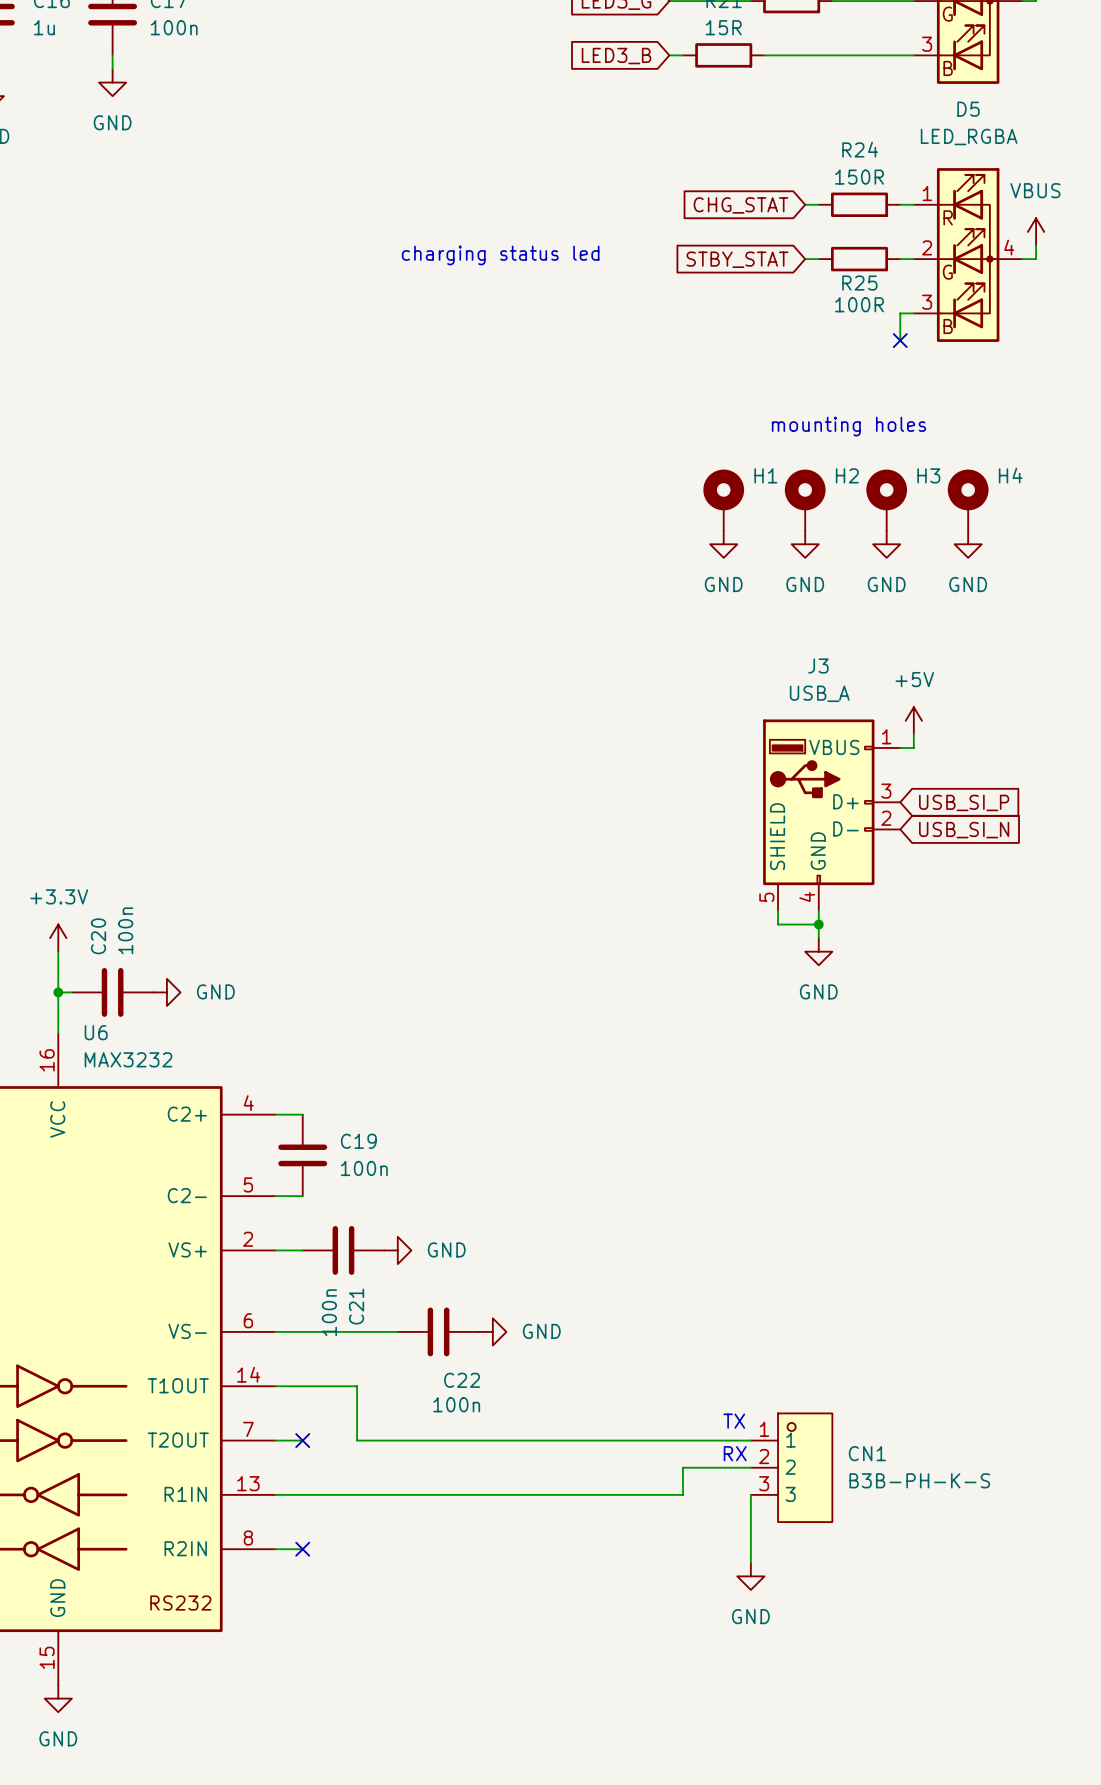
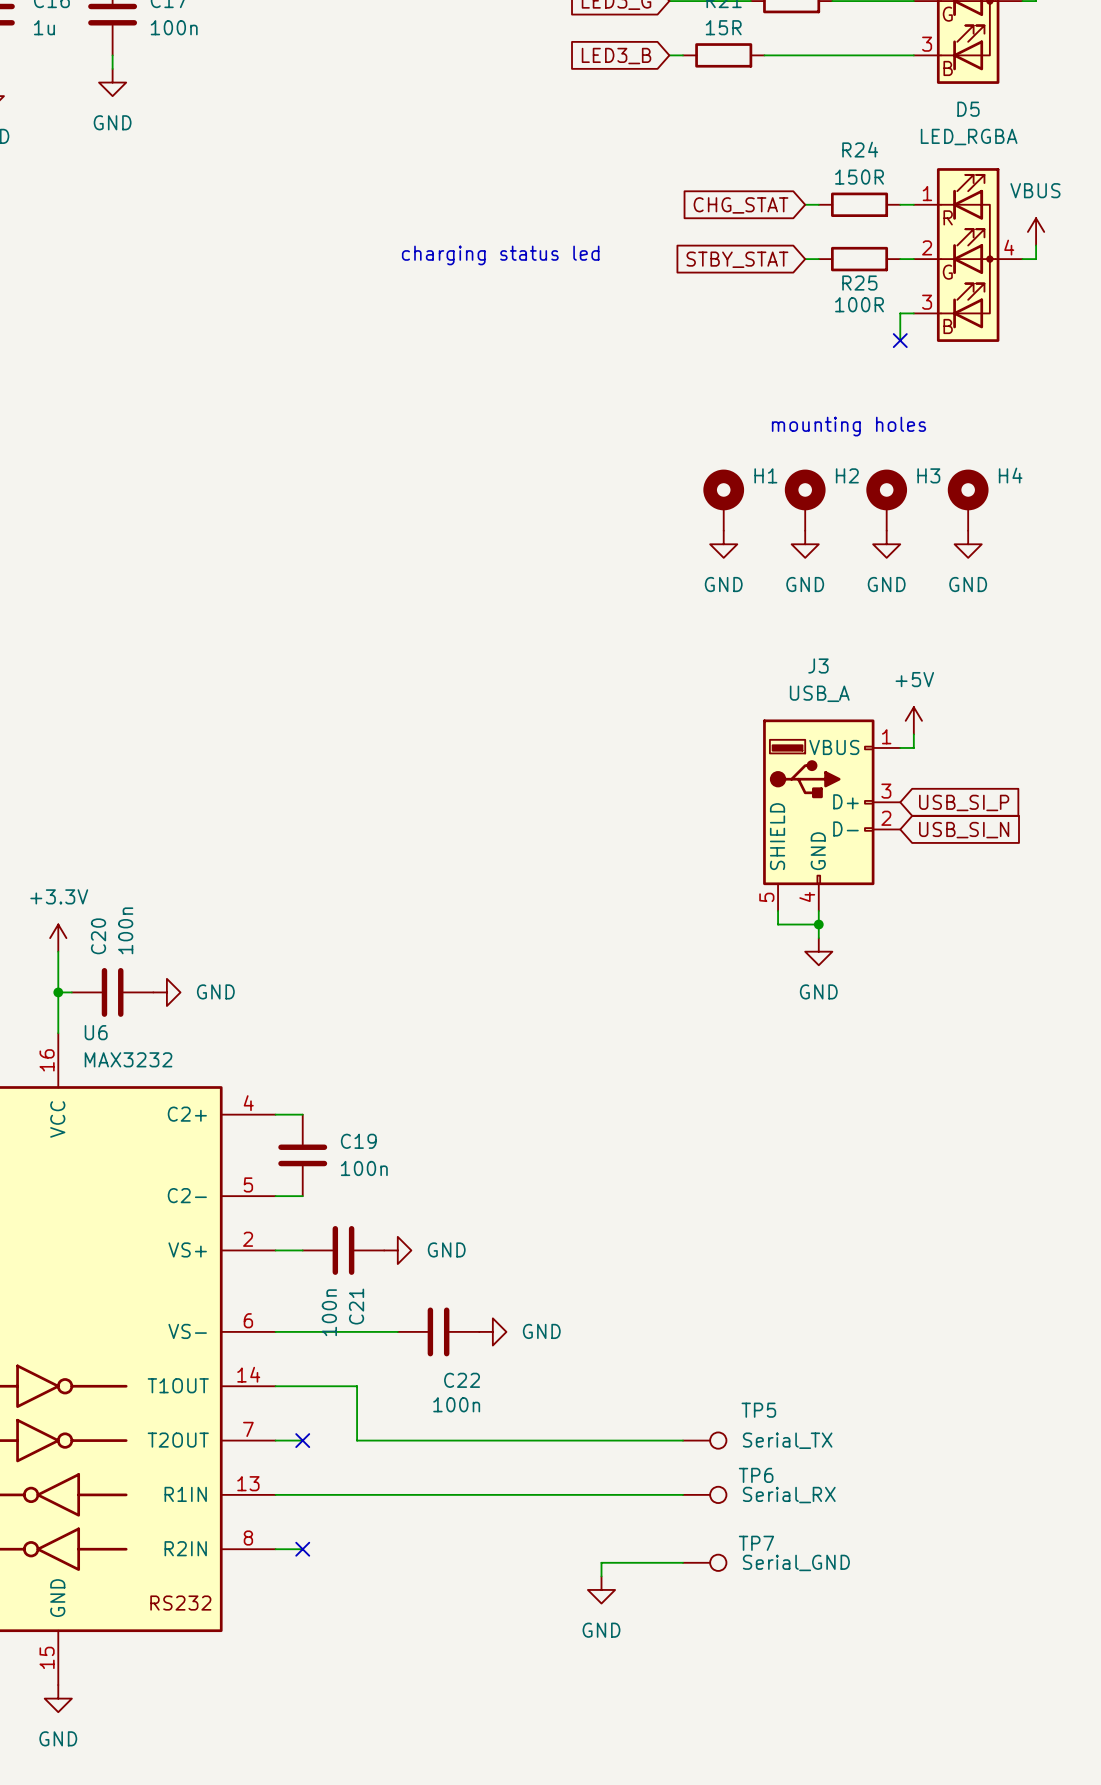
text: TX (734, 1421) -> none
wire: (682, 1440) (750, 1440) -> none
TP5: none -> Serial_TX (704, 1440)
text: RX (735, 1453) -> none
wire: (750, 1467) (682, 1467) (682, 1494) -> none
CN1: B3B-PH-K-S (791, 1467) -> none
TP6: none -> Serial_RX (704, 1494)
wire: (750, 1494) (750, 1562) -> none
wire: none -> (682, 1562) (601, 1562) (601, 1576)
TP7: none -> Serial_GND (704, 1562)
power symbol position: GND (750, 1576) -> GND (601, 1589)

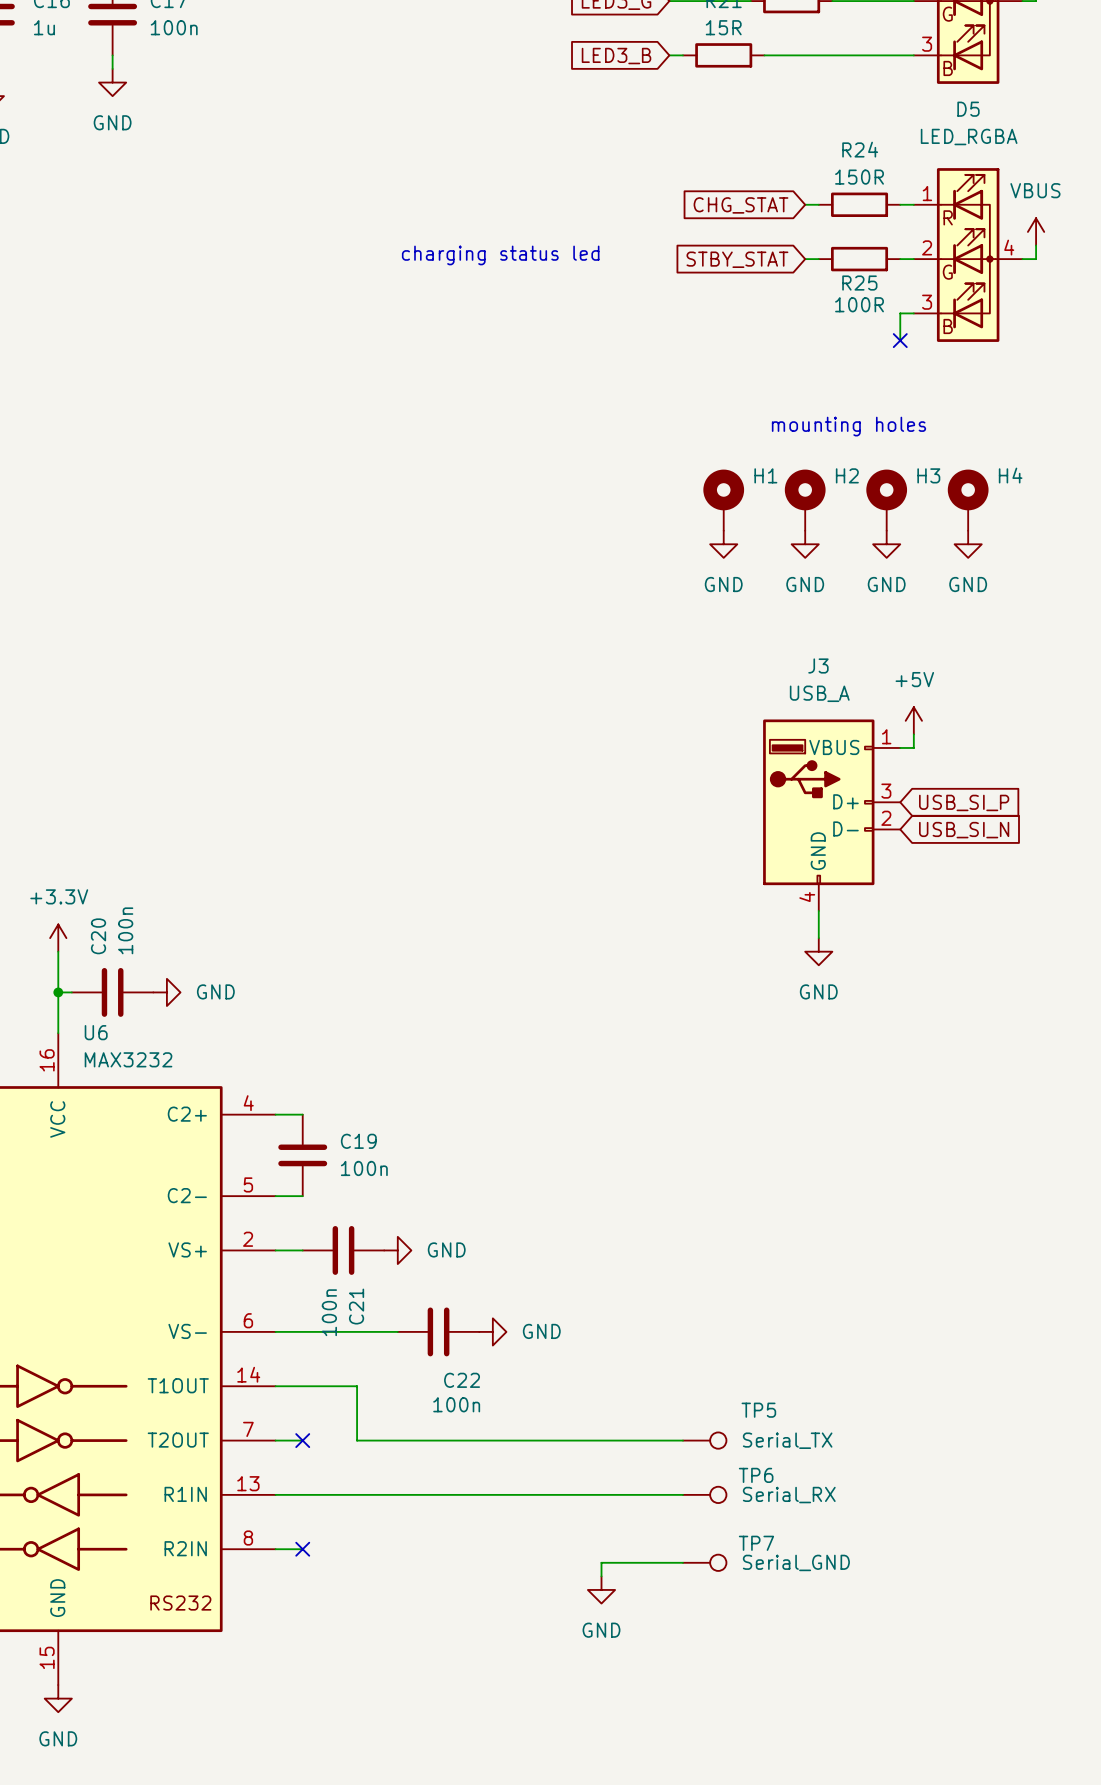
J3 symbol: [763, 719, 901, 911] -> [763, 719, 901, 911]
wire: (778, 910) (778, 924) (818, 924) -> none
junction: (818, 924) -> none

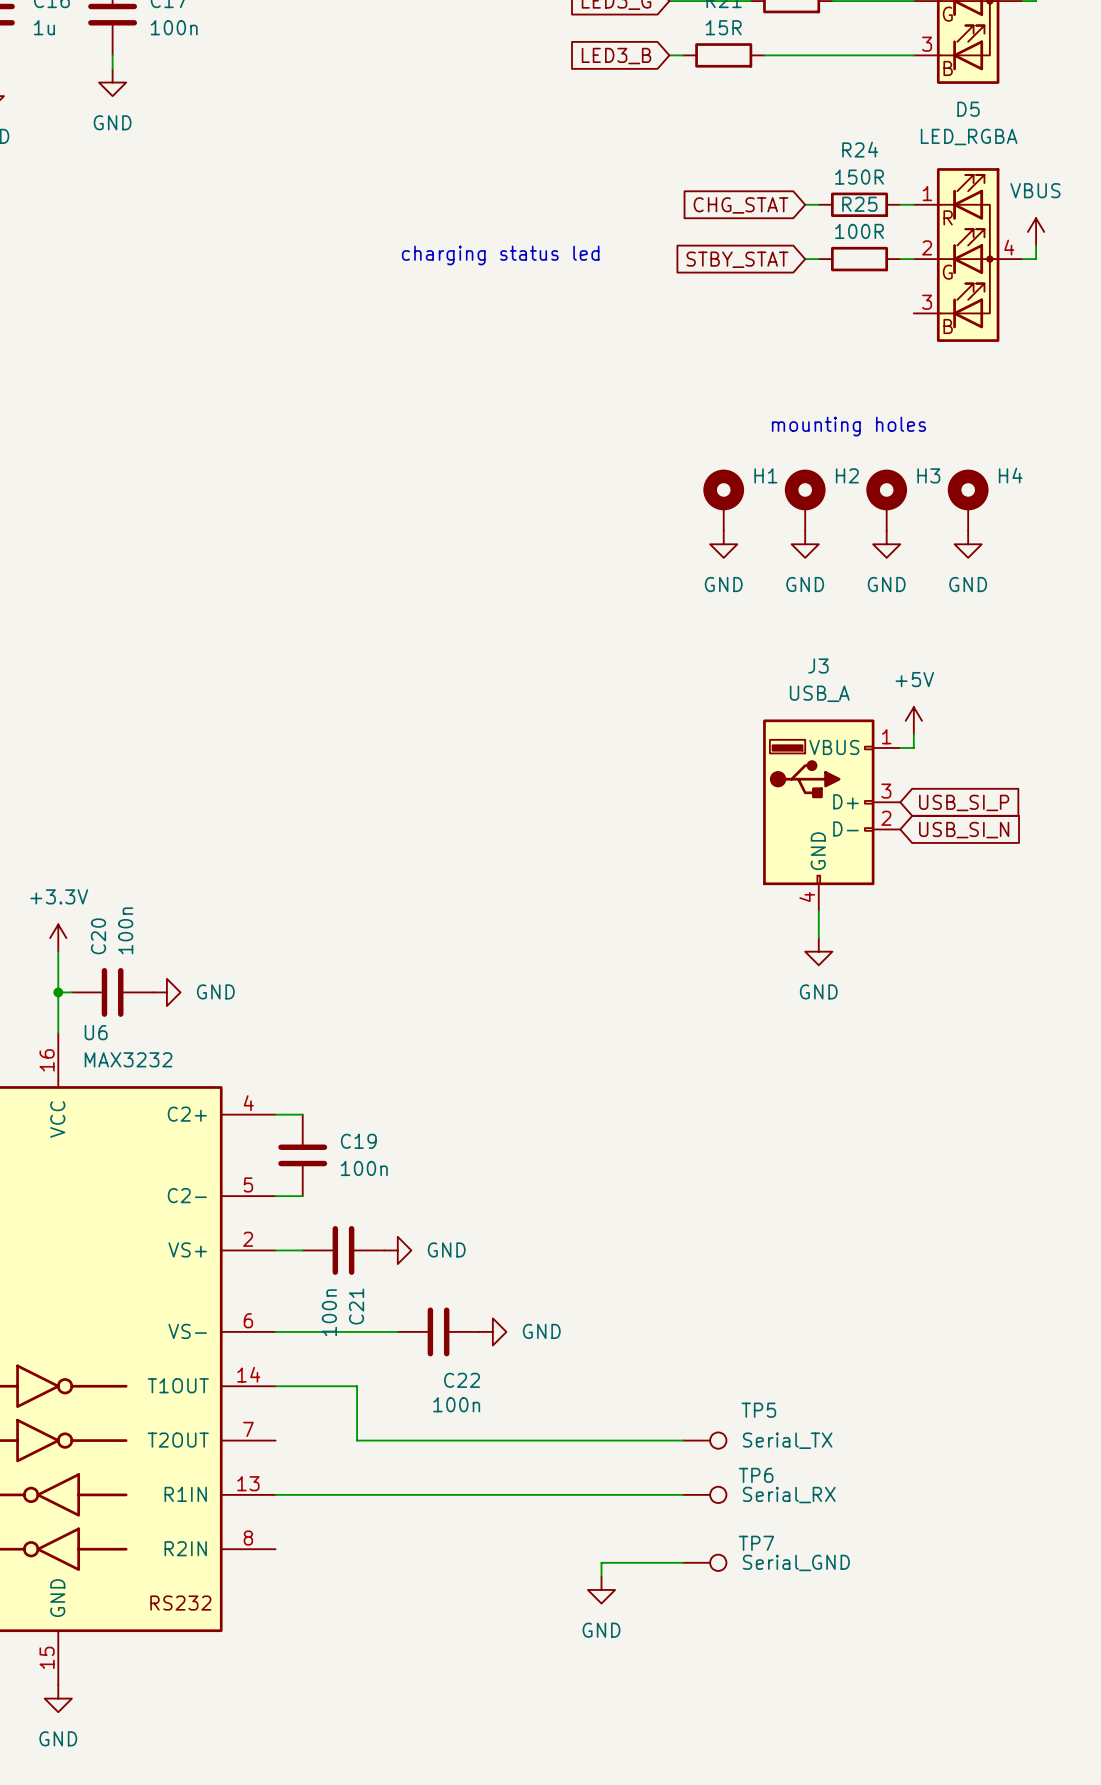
R25 name position: R25 (859, 283) -> R25 (859, 204)
R25 value position: 100R (859, 304) -> 100R (859, 231)
wire: (913, 313) (900, 313) (900, 340) -> none
no-connect mark: (900, 340) -> none
wire: (275, 1440) (302, 1440) -> none
no-connect mark: (302, 1440) -> none
wire: (275, 1549) (302, 1549) -> none
no-connect mark: (302, 1549) -> none

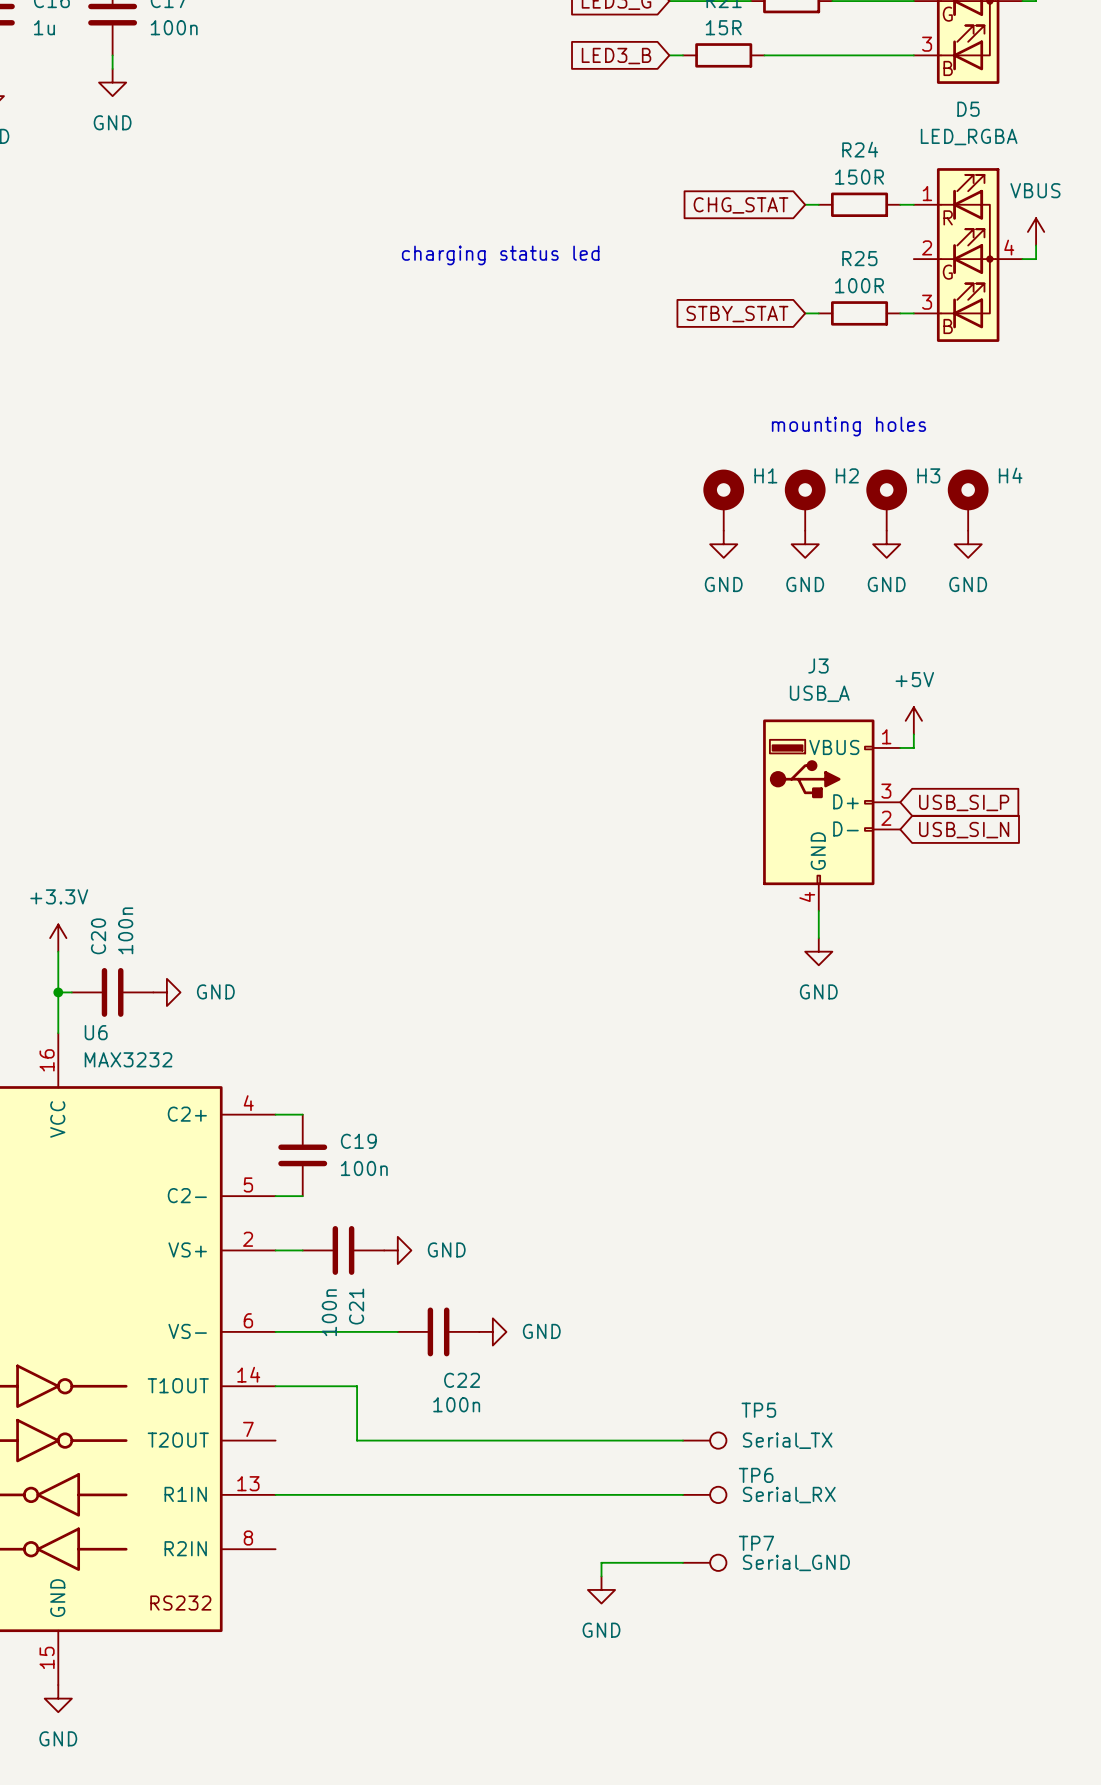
global label position: STBY_STAT (737, 259) -> STBY_STAT (737, 314)
wire: (805, 259) (818, 259) -> (805, 313) (818, 313)
R25 position: (859, 259) -> (859, 313)
wire: (900, 259) (913, 259) -> (900, 313) (913, 313)

